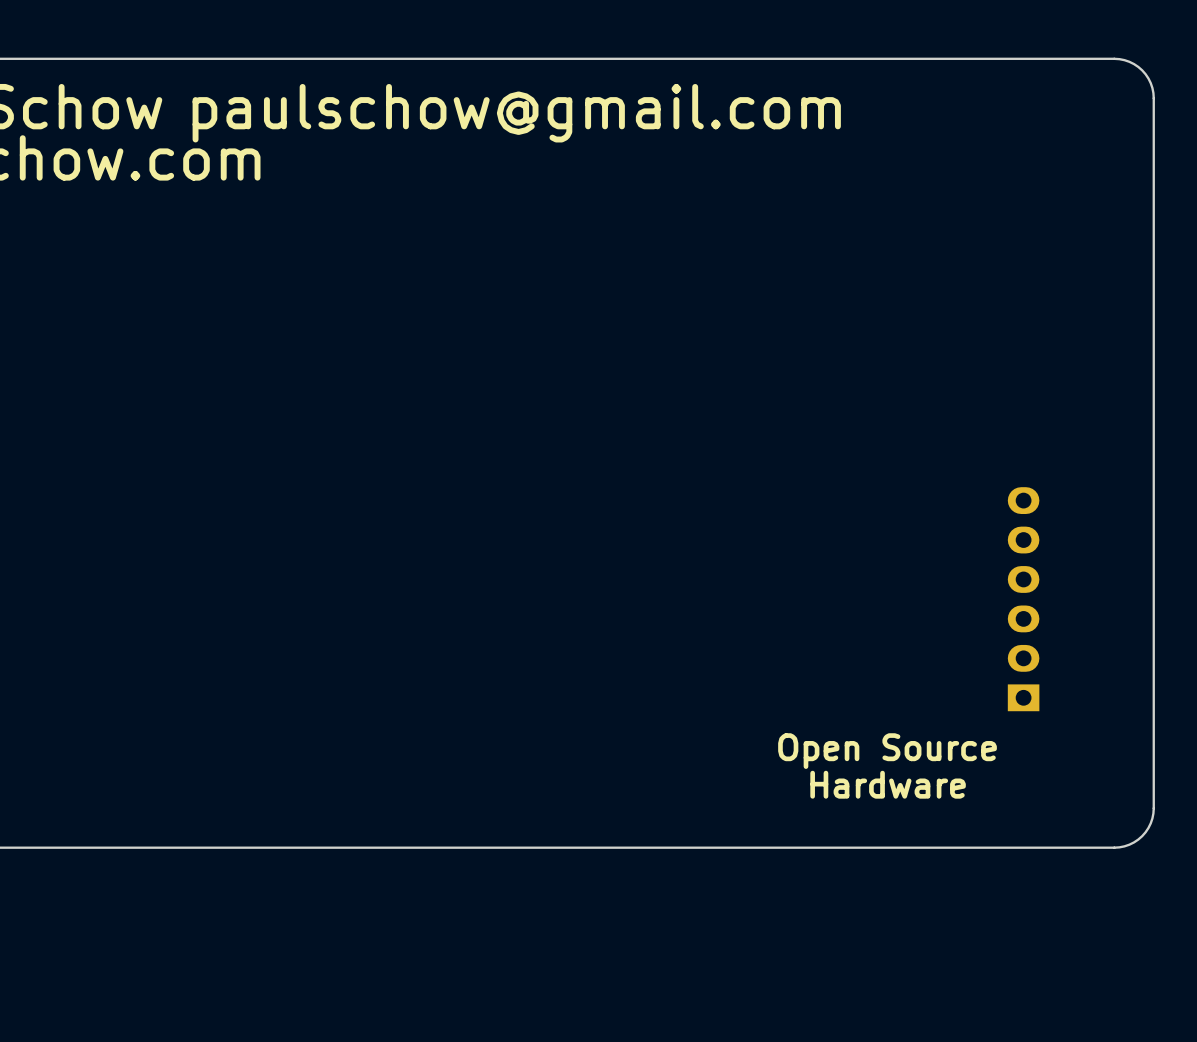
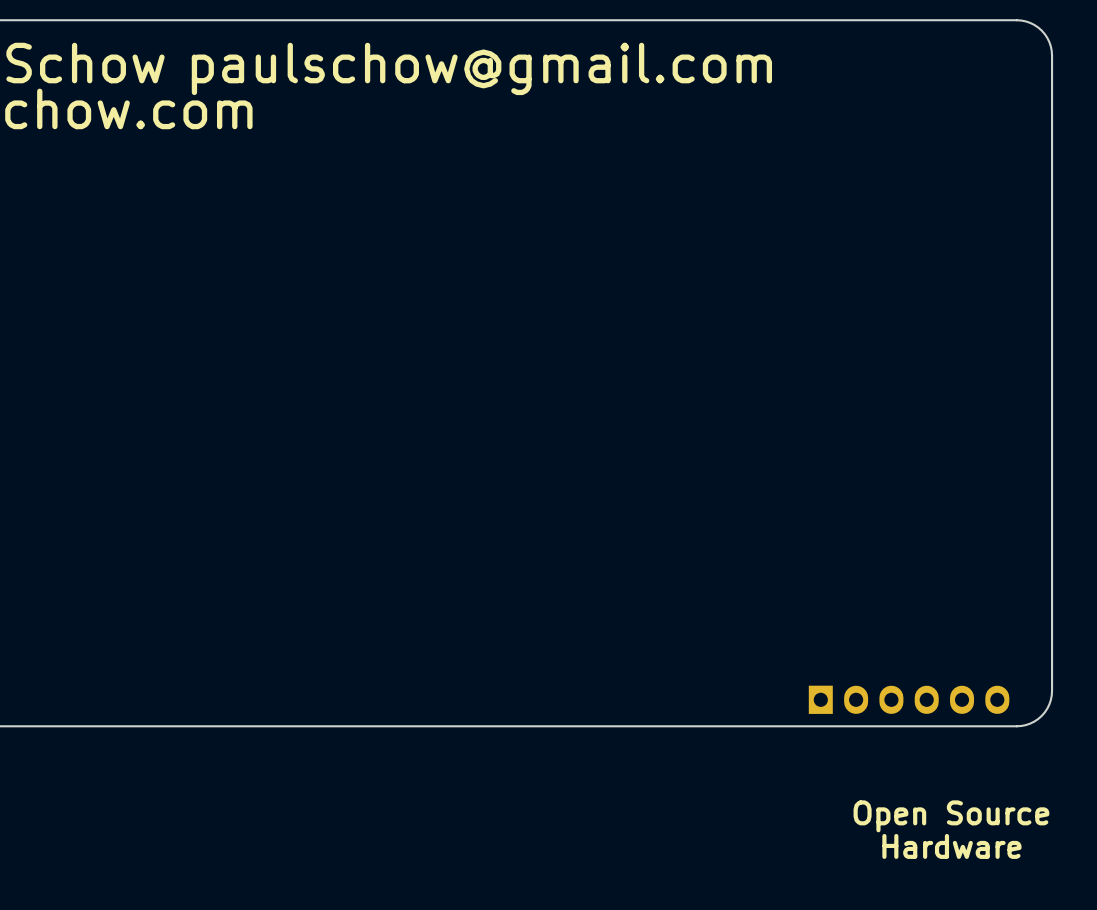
part rotation: 0° (1023, 599) -> 90° clockwise (909, 699)
part position: (1023, 599) -> (909, 699)
text position: Open Source (887, 751) -> Open Source (951, 816)
text position: Hardware (888, 784) -> Hardware (951, 846)

